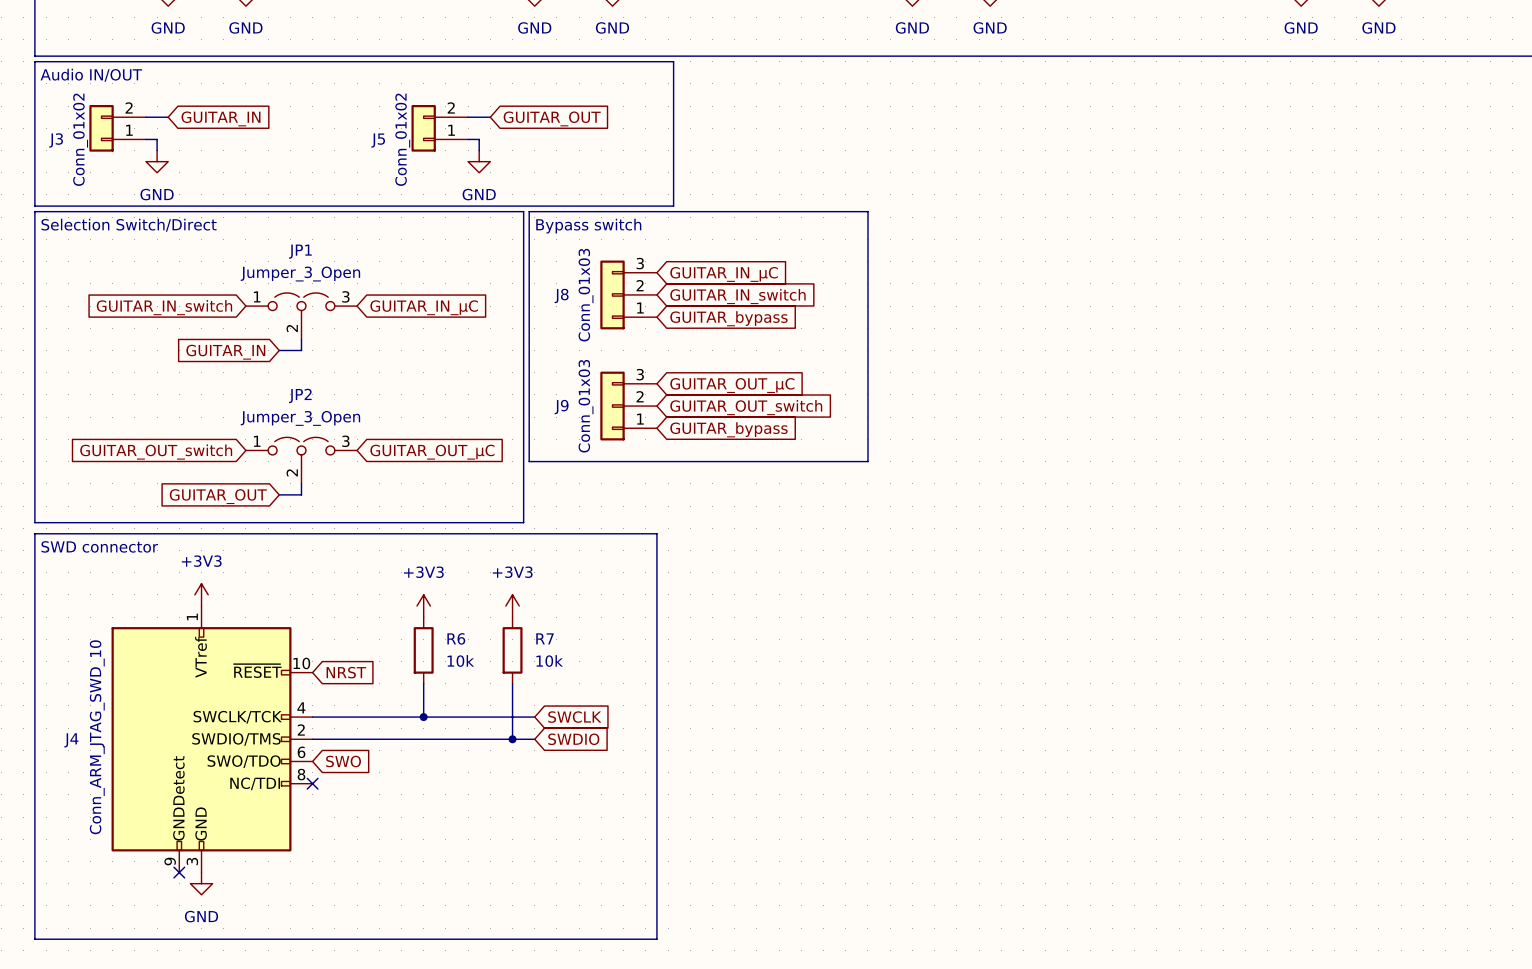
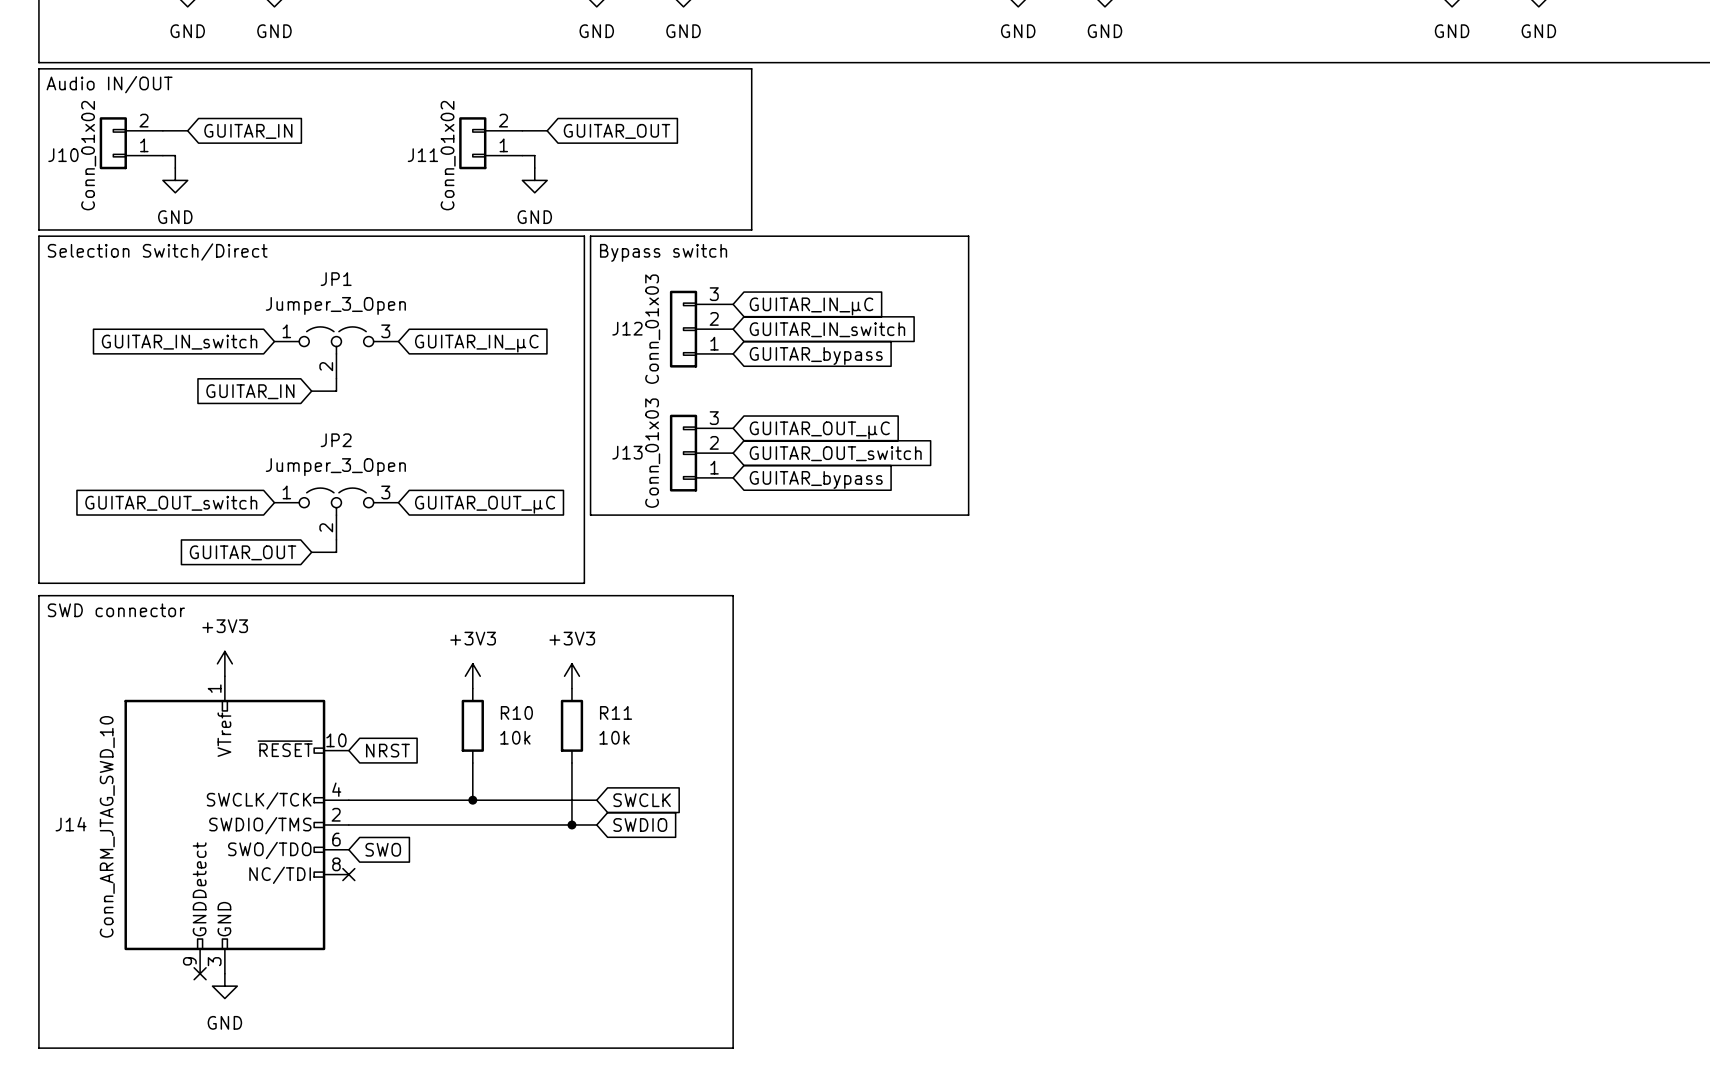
J3 name: J3 (56, 140) -> J10 (63, 155)
J5 name: J5 (378, 140) -> J11 (422, 155)
J8 name: J8 (561, 295) -> J12 (627, 328)
J9 name: J9 (561, 407) -> J13 (627, 452)
R6 name: R6 (456, 638) -> R10 (516, 712)
R7 name: R7 (544, 638) -> R11 (616, 712)
J4 name: J4 (71, 740) -> J14 (71, 824)

